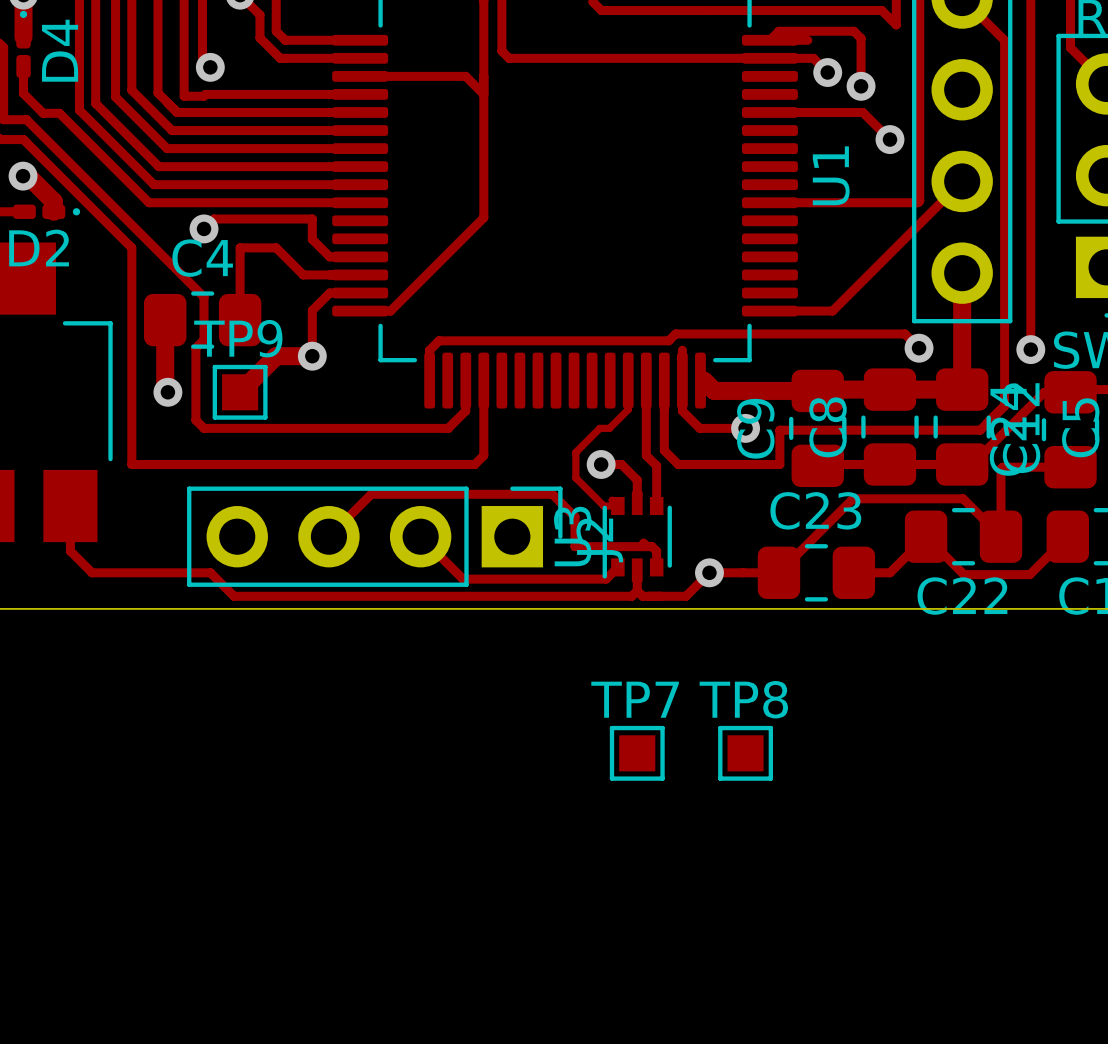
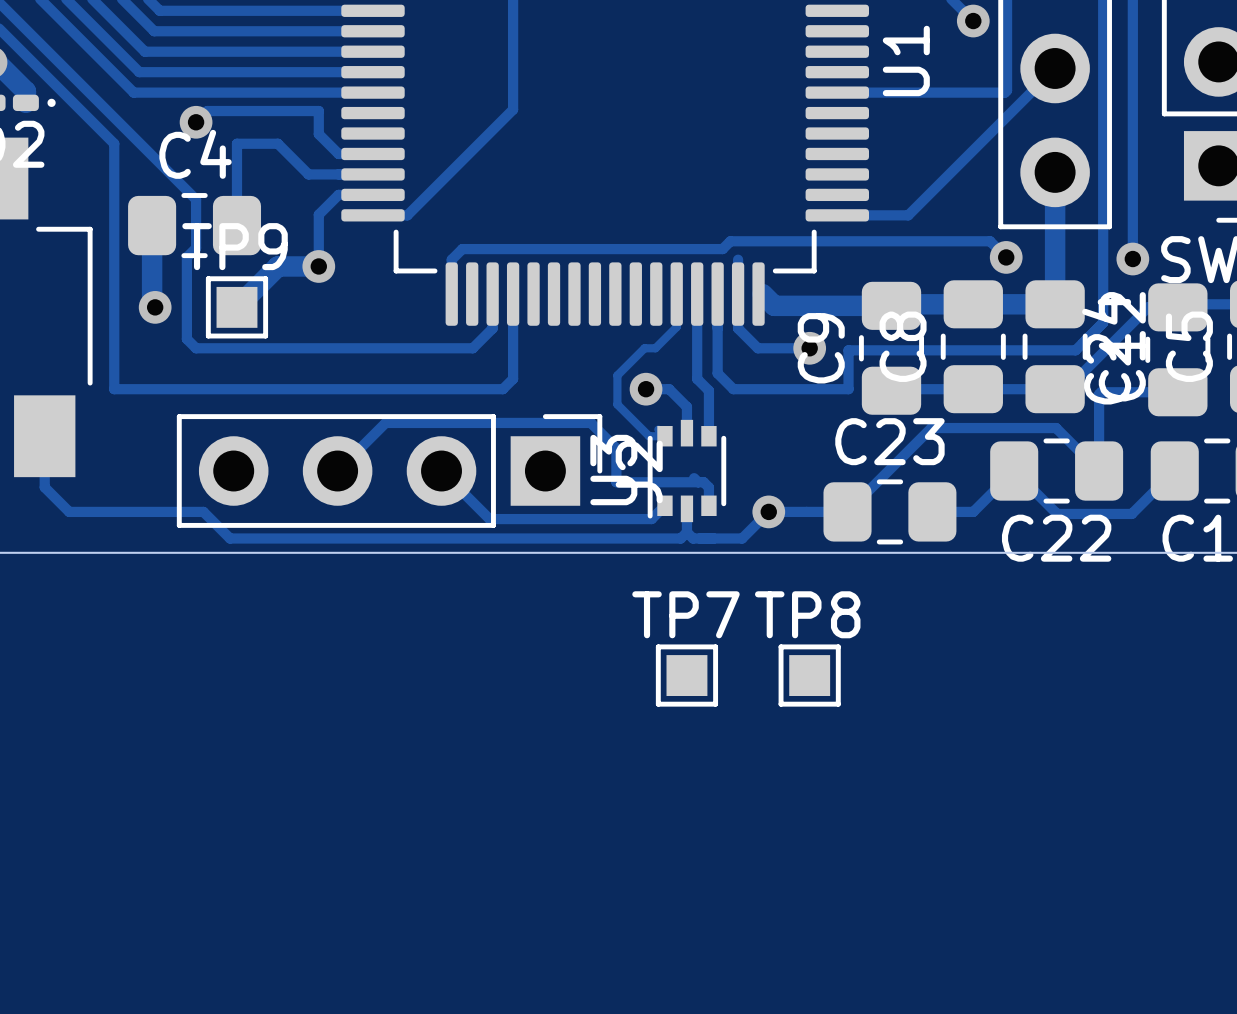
TP7 position: (637, 753) -> (686, 675)
TP8 position: (745, 753) -> (809, 675)

